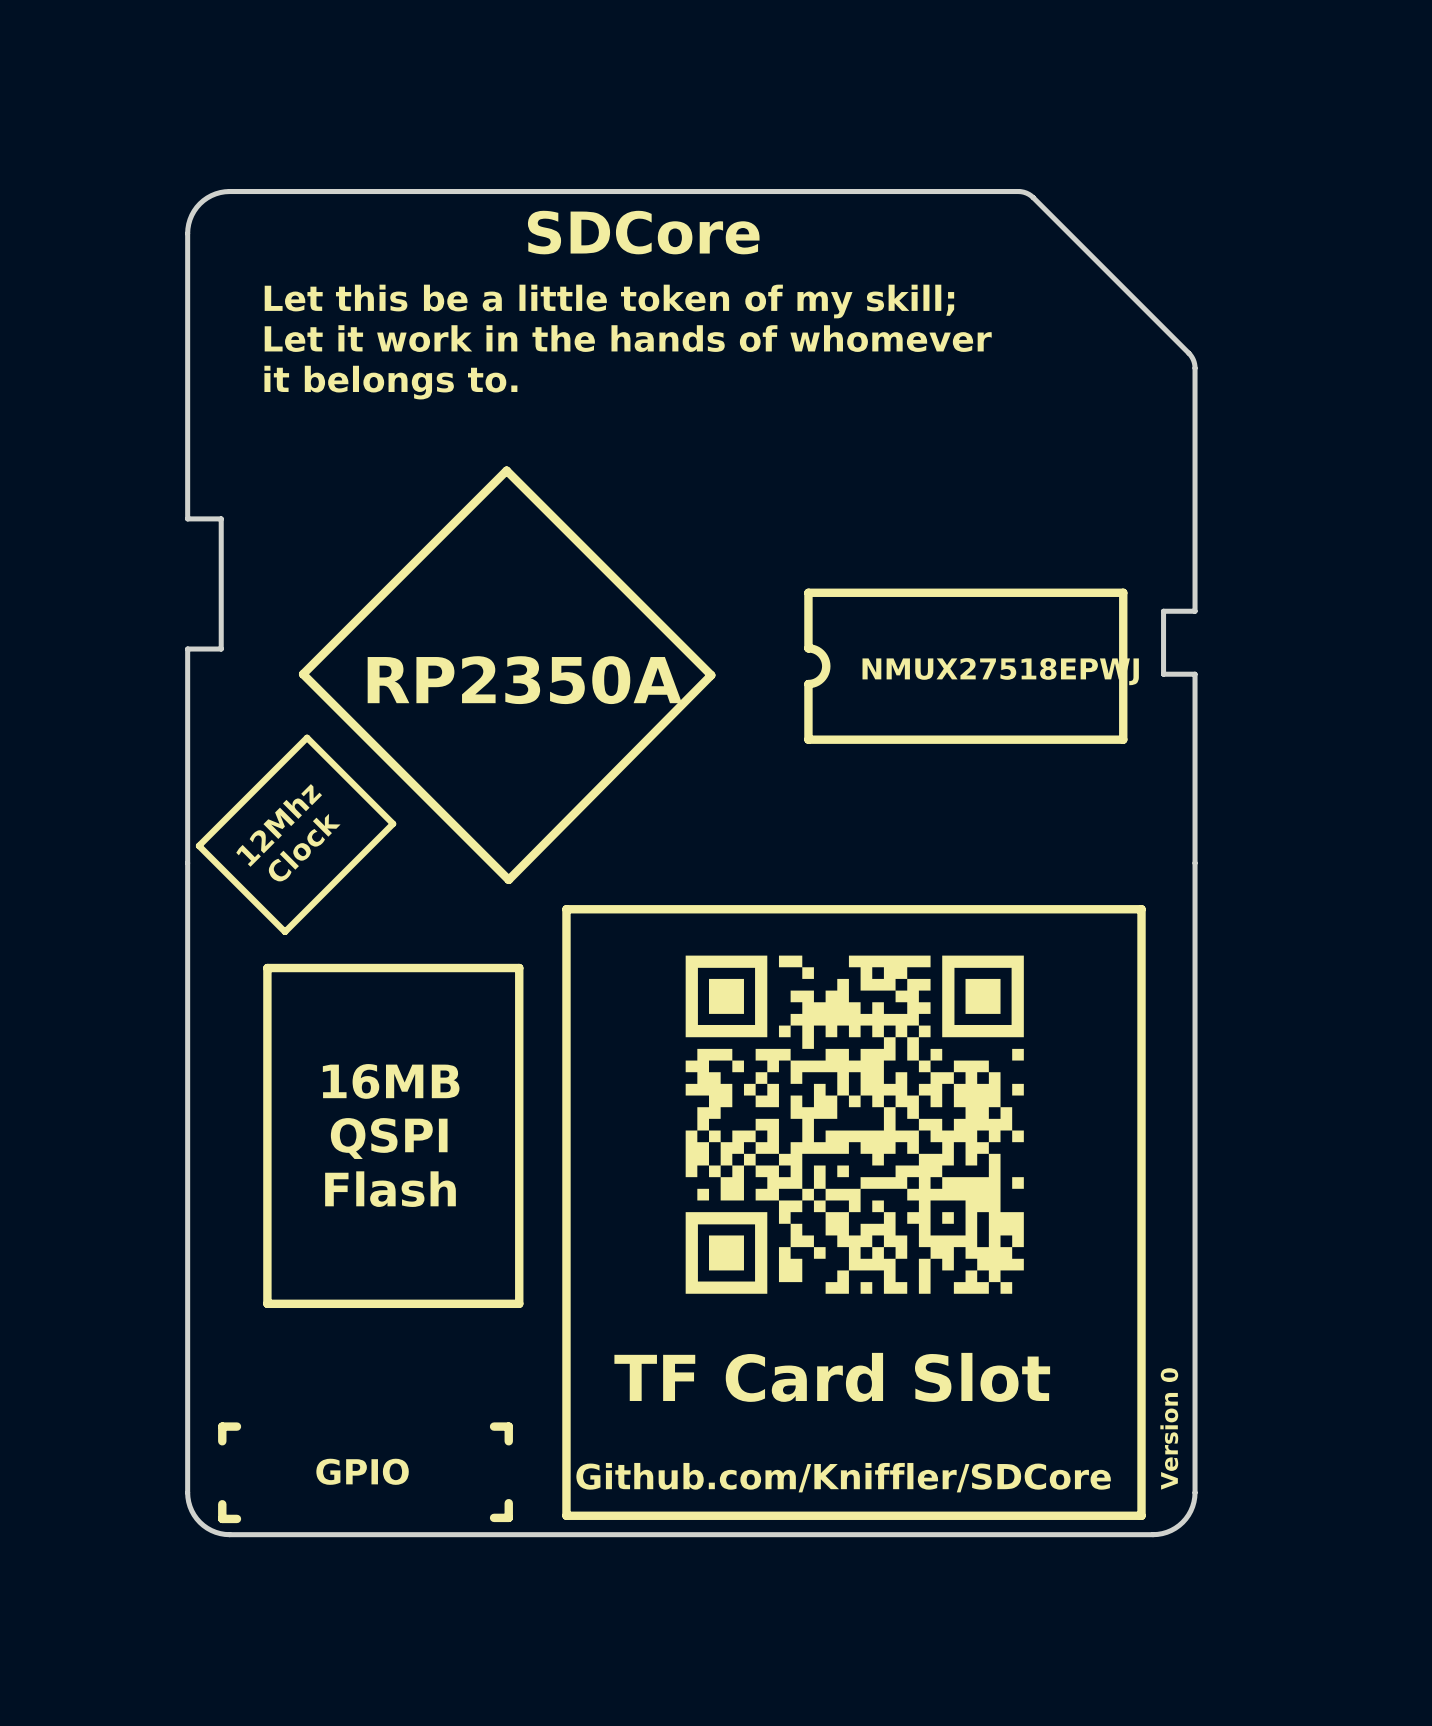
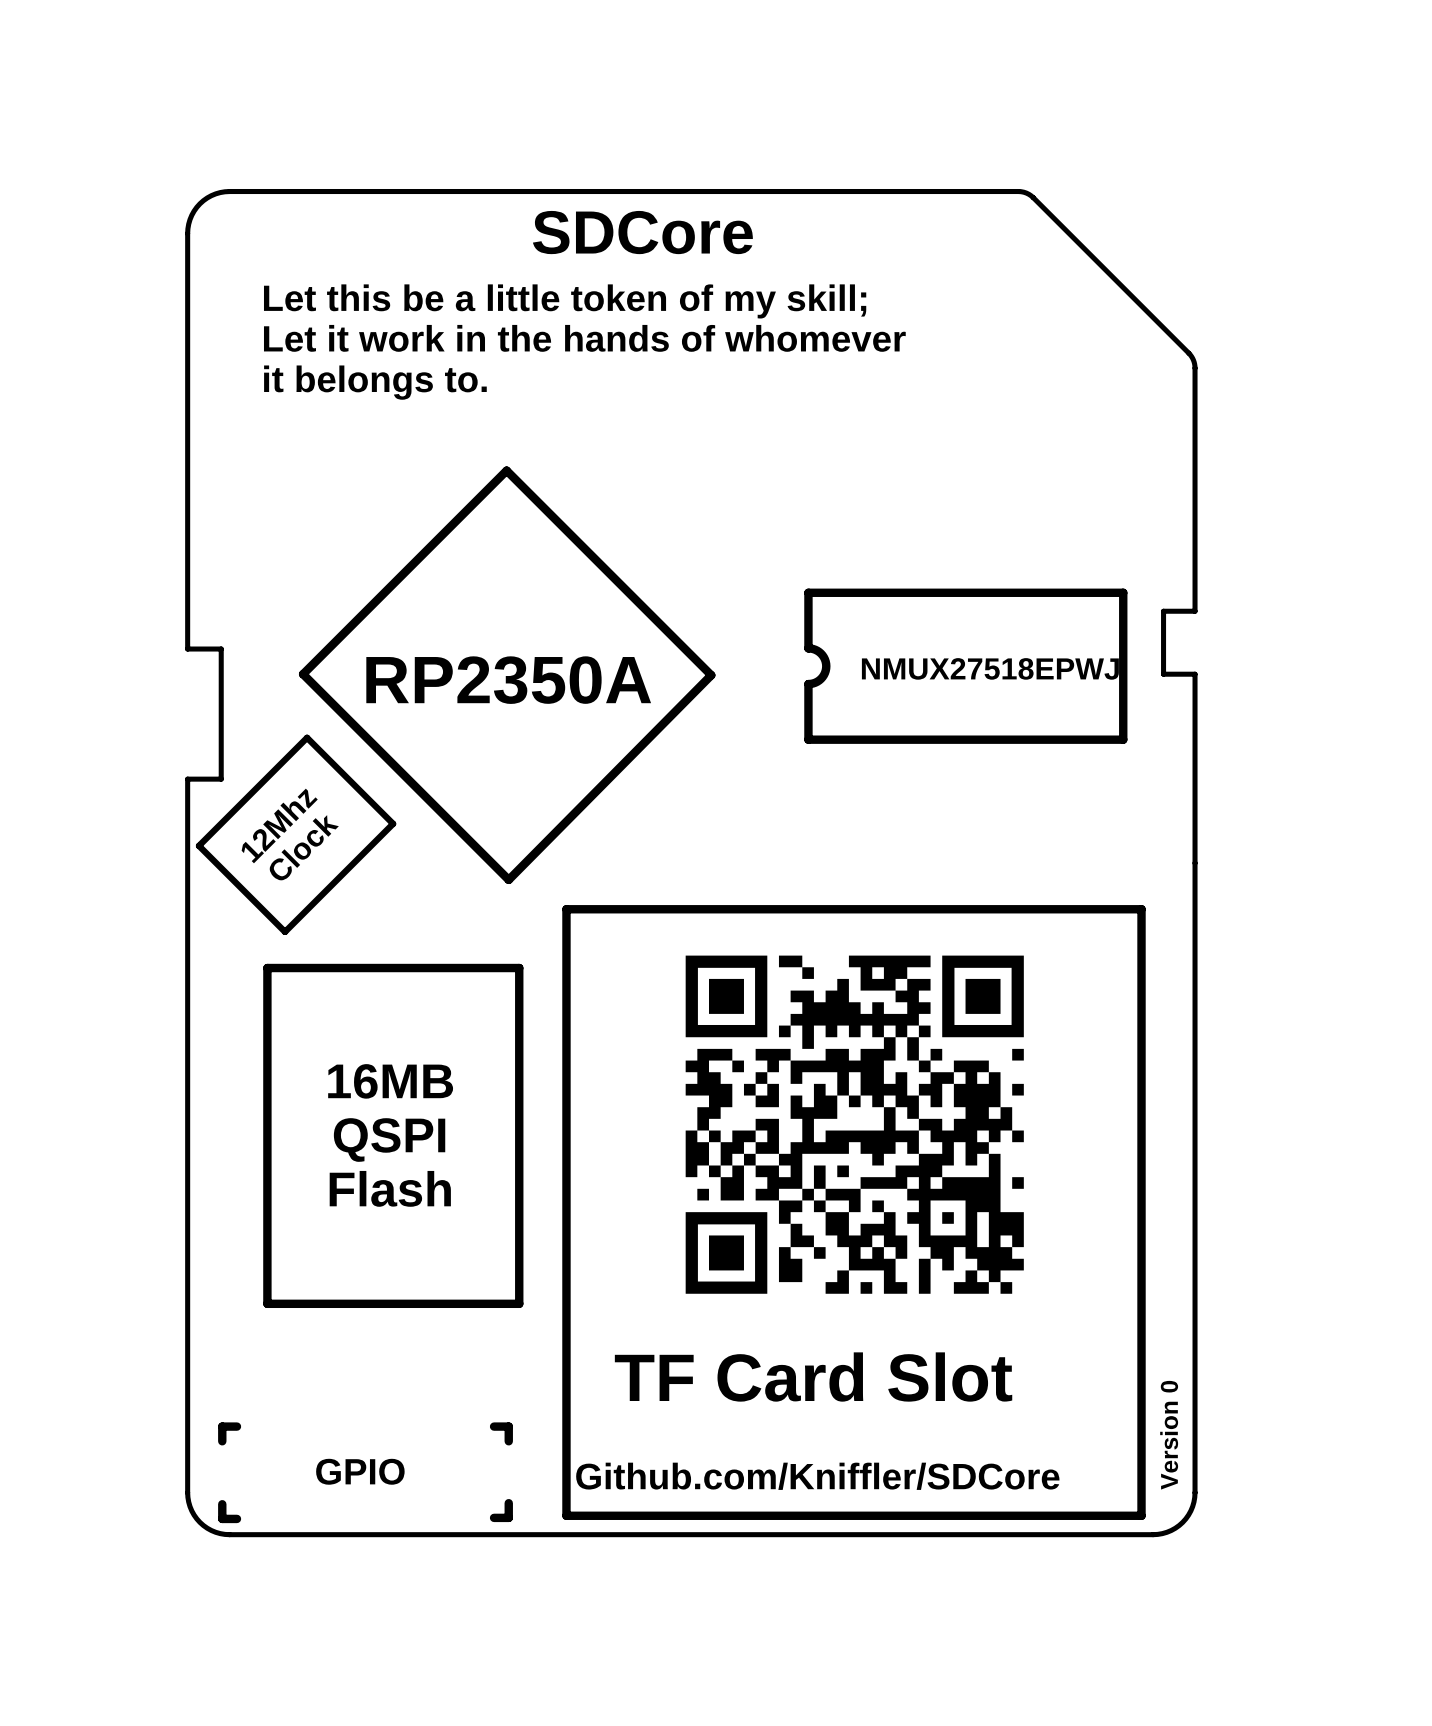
part footprint: [185, 188, 1198, 1538] -> [185, 188, 1198, 1538]

